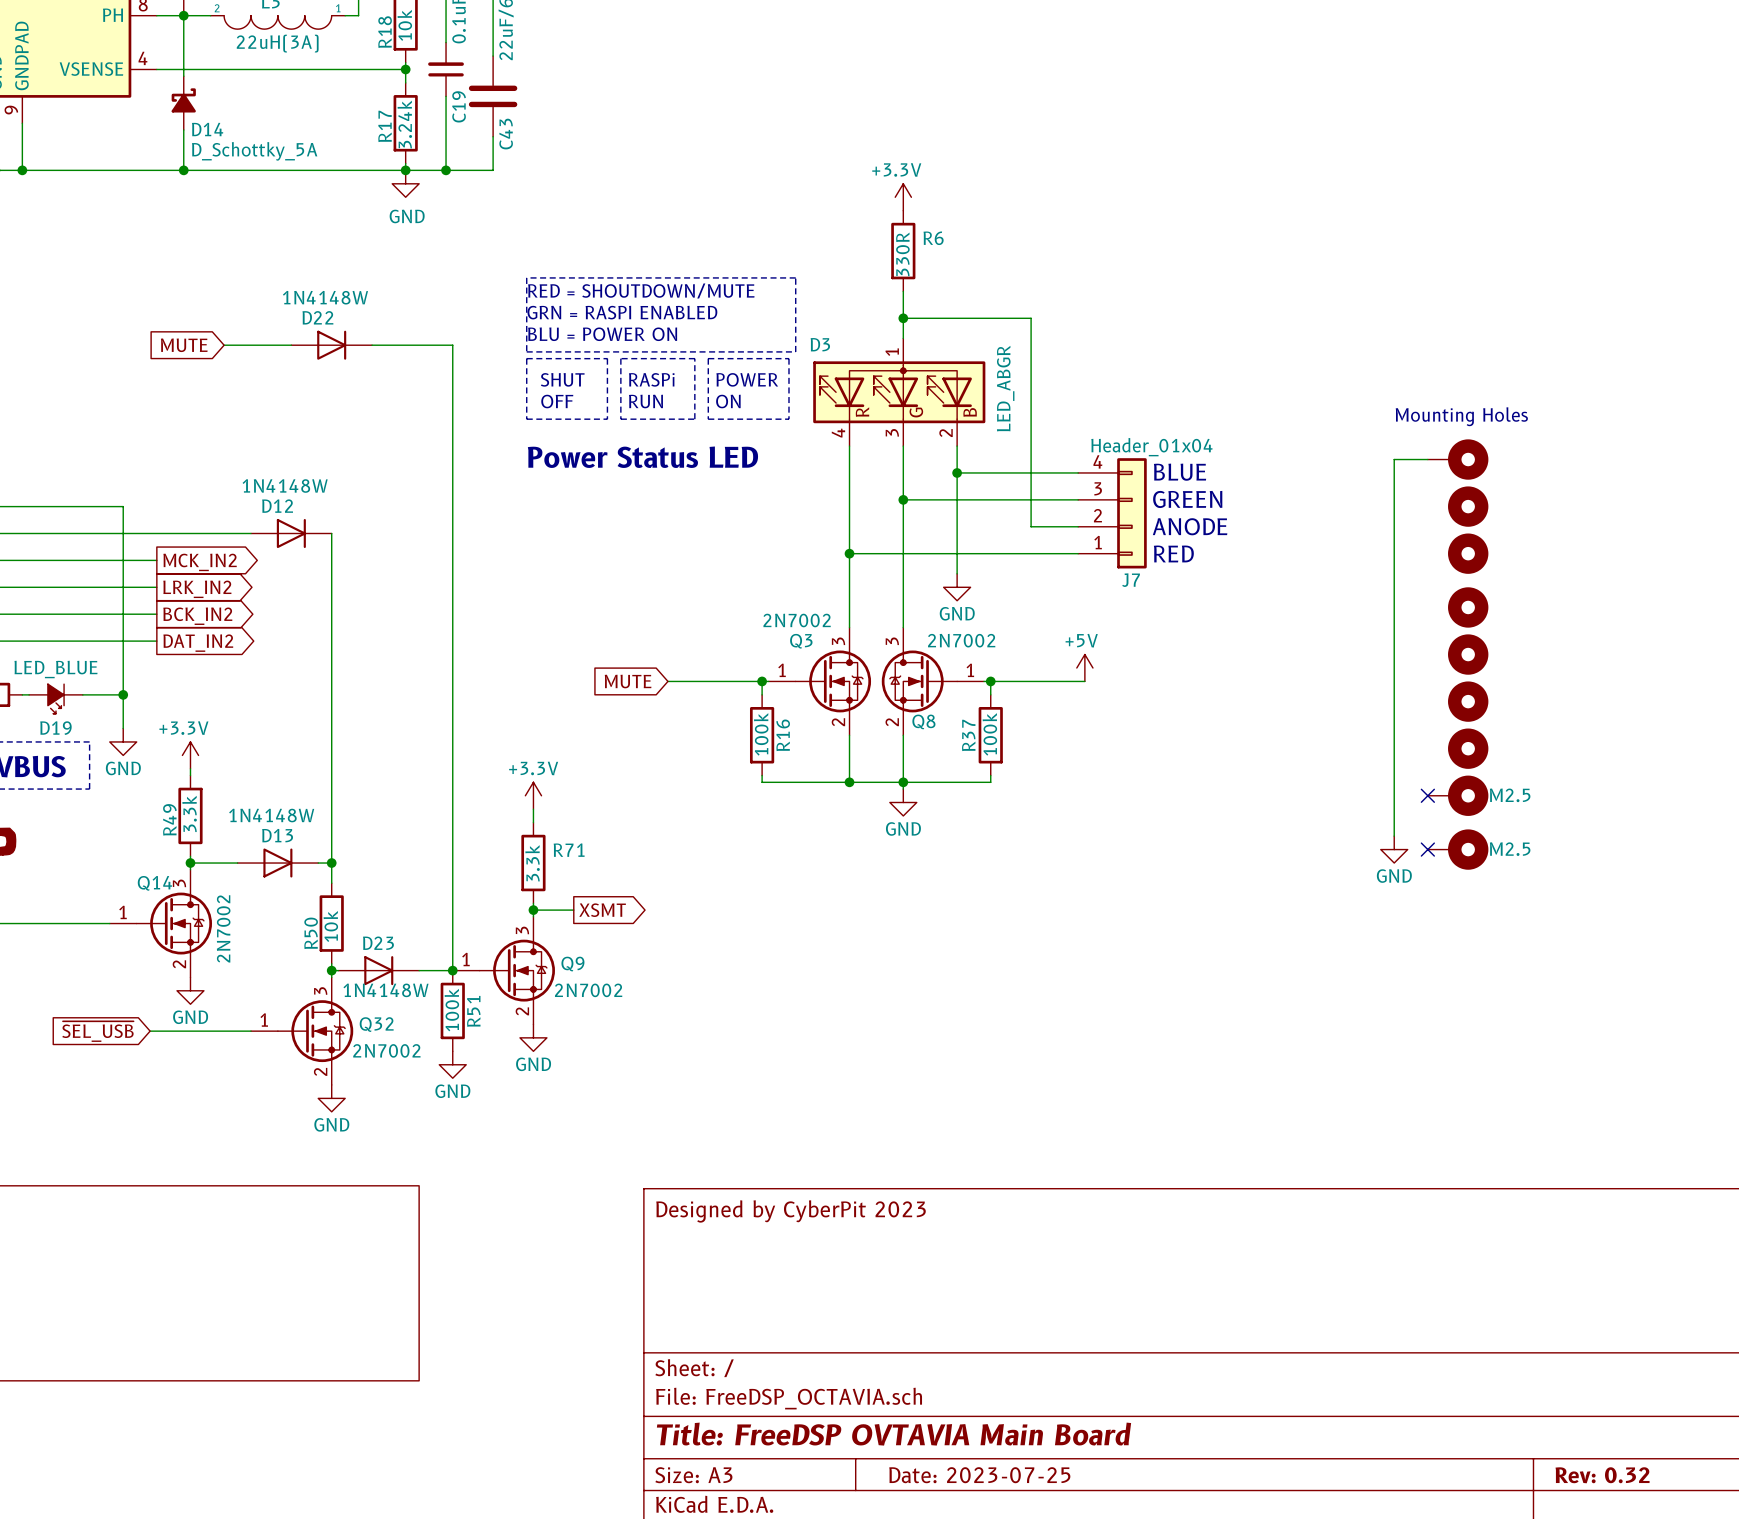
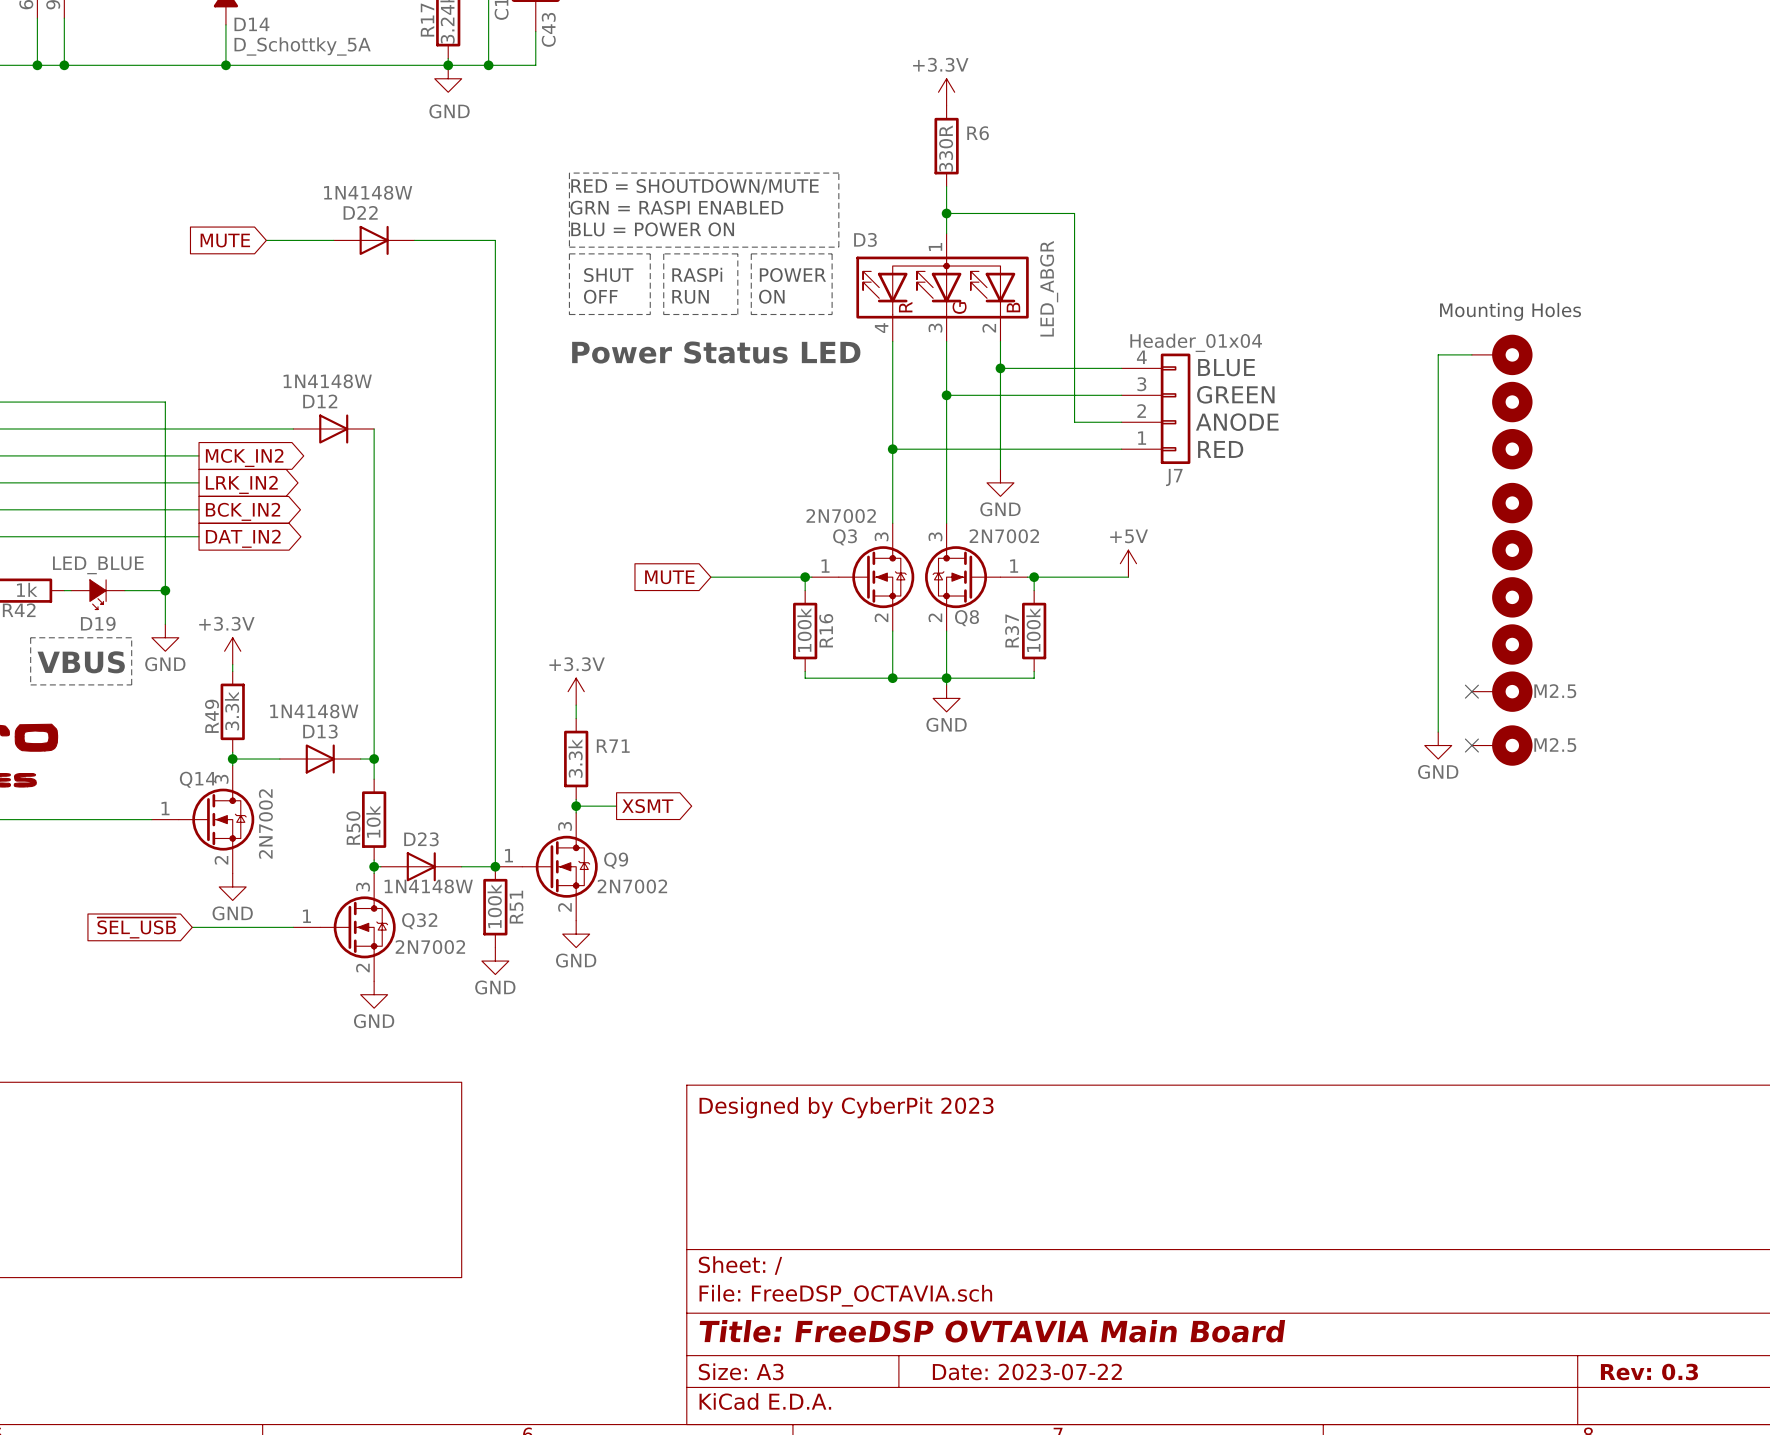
title block: Date: 2023-07-25 (979, 1475) -> Date: 2023-07-22 (1027, 1372)
title block: Rev: 0.32 (1602, 1475) -> Rev: 0.3 (1649, 1372)

